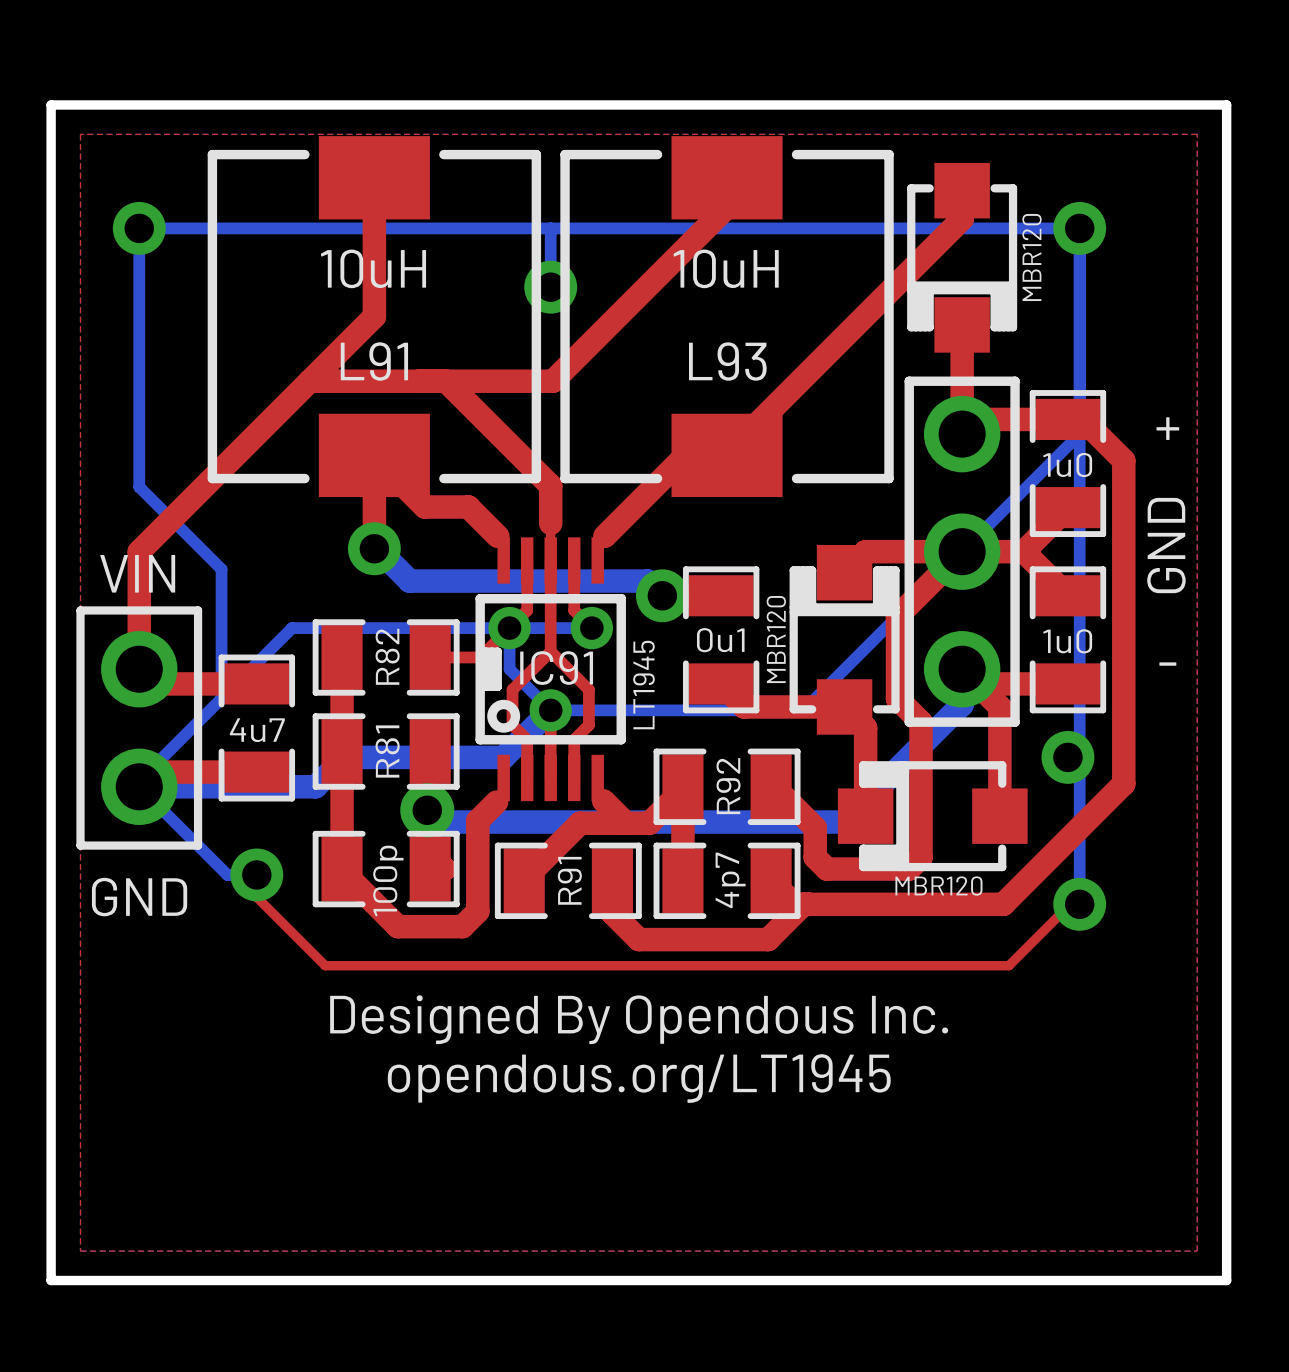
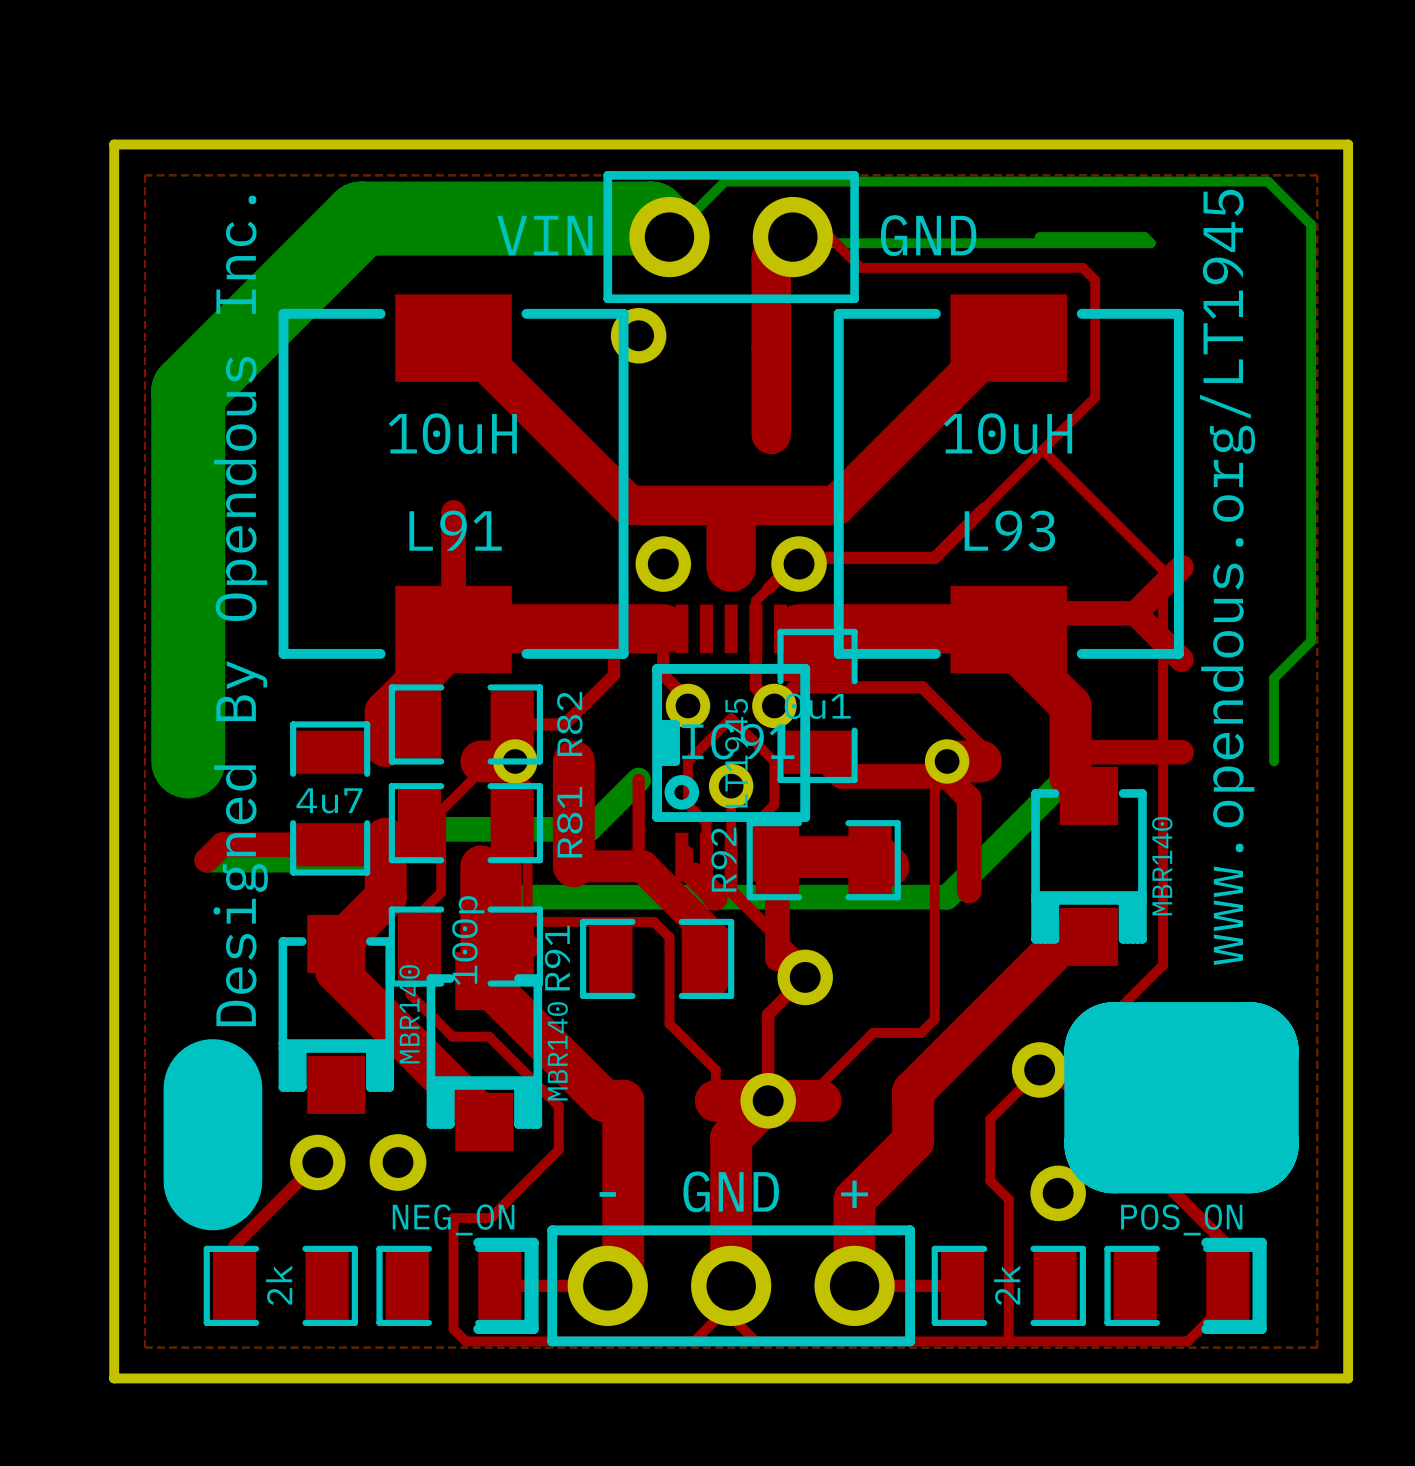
top track: (374, 177) (374, 316) (139, 551) (139, 669) (153, 683) (256, 683) -> none
top track: (727, 177) (727, 207) (552, 381) (309, 381) -> none
top track: (962, 190) (962, 219) (727, 455) (685, 455) (597, 543) (597, 560) -> none
text: none -> GND (928, 235)
bottom track: none -> (669, 237) (725, 181) (1267, 181) (1311, 224) (1311, 641) (1274, 678) (1274, 761)
bottom track: none -> (669, 237) (650, 218) (361, 218) (188, 391) (188, 761)
bottom track: none -> (792, 237) (799, 243) (1150, 243) (1144, 237) (1039, 237)
part: (139, 228) -> none
bottom track: (550, 228) (550, 287) -> none
part: (1079, 228) -> none
part: MBR120 (962, 257) -> none
top track: none -> (453, 338) (462, 338) (629, 505) (836, 505) (1003, 338) (1008, 338)
L91 position: (374, 316) -> (453, 483)
L93 position: (727, 316) -> (1008, 483)
top track: (962, 324) (962, 434) (976, 419) (1082, 419) (1123, 460) (1123, 783) (1003, 904) (794, 904) (771, 880) -> none
top track: (446, 381) (550, 485) (550, 651) -> none
top track: none -> (771, 434) (771, 258) (792, 237) (829, 237) (860, 267) (1082, 267) (1095, 280) (1095, 397) (934, 557) (799, 557) (755, 601) (755, 687) (774, 705) (792, 687) (922, 687) (981, 746) (981, 761) (947, 761) (947, 776) (934, 789) (934, 1019) (921, 1032) (873, 1032) (820, 1085) (820, 1100) (715, 1100) (715, 1069) (669, 1023) (669, 937) (654, 921) (536, 921) (527, 912) (527, 786) (515, 773) (515, 761) (481, 761) (481, 770) (441, 810) (441, 892) (410, 923) (410, 994) (452, 1036) (489, 1036) (558, 1106) (558, 1149) (490, 1218) (453, 1218) (453, 1329) (465, 1341) (694, 1341) (731, 1304)
top track: none -> (1042, 449) (1163, 570) (1163, 965) (1058, 1069) (1039, 1069)
text position: + (1167, 428) -> + (854, 1194)
bottom track: (1079, 434) (803, 710) (550, 710) (509, 669) (509, 628) -> none
top track: none -> (731, 511) (731, 567)
top track: (374, 456) (424, 507) (468, 507) (503, 542) (503, 560) -> none
part: 1u0 (1067, 463) -> none
part: none -> (663, 564)
part: none -> (799, 564)
text: none -> www.opendous.org/LT1945 (1227, 577)
text: GND (1166, 545) -> none
bottom track: (374, 548) (377, 548) (409, 581) (647, 581) (662, 595) -> none
part: (374, 548) -> none
top track: (962, 551) (897, 616) (897, 698) (921, 722) (921, 857) (909, 869) (826, 869) (815, 857) (815, 827) (774, 786) (771, 786) -> none
part rotation: 0° (962, 551) -> 90° clockwise (731, 1285)
part position: (962, 551) -> (731, 1285)
top track: none -> (681, 628) (454, 628) (453, 644) (385, 712) (385, 746)
top track: none -> (780, 628) (1008, 628) (1008, 644) (1070, 705) (1070, 777) (1089, 795)
text position: VIN (137, 573) -> VIN (544, 235)
part: (662, 595) -> none
part: (509, 628) -> none
bottom track: (591, 628) (292, 628) (139, 780) (139, 786) (227, 874) (256, 874) -> none
part position: (591, 628) -> (687, 705)
part: none -> (774, 705)
part: MBR120 (844, 639) -> none
part: 1u0 (1067, 639) -> none
top track: (550, 651) (512, 689) (512, 725) (527, 739) (527, 777) -> none
top track: (550, 651) (588, 689) (588, 725) (574, 739) (574, 777) -> none
R82 name position: R82 (387, 656) -> R82 (569, 723)
top track: (342, 657) (342, 870) (397, 926) (462, 926) (477, 911) (477, 820) (503, 795) (503, 777) -> none
text position: - (1167, 664) -> - (607, 1194)
IC91 position: (550, 669) -> (731, 742)
top track: (962, 669) (999, 706) (999, 816) -> none
part: none -> (515, 761)
top track: none -> (573, 761) (573, 866) (642, 866) (715, 939) (715, 977)
part: none -> (947, 761)
bottom track: (221, 698) (221, 569) (139, 487) (139, 228) (1079, 228) (1079, 745) (1067, 757) (1079, 769) (1079, 904) -> none
part: (550, 710) -> none
top track: none -> (731, 786) (731, 891) (805, 965) (805, 977) (768, 1014) (768, 1100) (731, 1137) (731, 1316) (755, 1341) (1187, 1341) (1227, 1301) (1227, 1245) (1051, 1069) (1039, 1069)
part: none -> (731, 786)
part rotation: 0° (139, 728) -> 90° clockwise (731, 237)
part position: (139, 728) -> (731, 237)
R81 name position: R81 (387, 751) -> R81 (569, 822)
part: (1067, 757) -> none
top track: none -> (385, 838) (385, 897) (338, 943) (336, 943) (336, 971) (484, 1119) (484, 1121)
top track: none -> (706, 857) (706, 823) (687, 804) (687, 761) (731, 718) (774, 761) (774, 804) (755, 823) (755, 857)
top track: none -> (780, 857) (879, 857) (888, 866)
R92 name position: R92 (728, 786) -> R92 (723, 859)
top track: (682, 789) (649, 823) (580, 823) (524, 880) -> none
top track: none -> (481, 866) (481, 977) (604, 1100) (623, 1100) (623, 1270) (607, 1285) (499, 1285)
part: none -> MBR140 (1089, 866)
part position: (427, 810) -> (398, 1162)
part: MBR120 (932, 816) -> none
part footprint: [653, 842, 801, 920] -> [777, 949, 833, 1006]
top track: none -> (1089, 936) (1067, 936) (913, 1091) (913, 1140) (854, 1199) (854, 1285) (962, 1285)
top track: (256, 874) (256, 897) (325, 965) (1008, 965) (1070, 904) (1079, 904) -> none
part position: (256, 874) -> (317, 1162)
part value position: 100p (388, 880) -> 100p (468, 940)
R91 name position: R91 (569, 880) -> R91 (557, 958)
top track: (612, 880) (612, 913) (638, 939) (768, 939) (803, 904) -> none
part value: 4p7 (730, 880) -> none
text: GND (139, 897) -> none
part: (1079, 904) -> none
part: none -> MBR140 (336, 1014)
part: none -> MBR140 (484, 1051)
line: none -> (1113, 1051) (1249, 1051) (1249, 1143) (1113, 1143) (1113, 1051)
top track: none -> (1039, 1069) (990, 1119) (990, 1181) (1008, 1199) (1008, 1341)
part: none -> (1039, 1069)
line: none -> (212, 1088) (212, 1181)
part: none -> (768, 1100)
text rotation: 0° (639, 1019) -> 90° counterclockwise (240, 610)
top track: none -> (317, 1162) (234, 1245) (234, 1285)
text: opendous.org/LT1945 (639, 1078) -> GND (731, 1191)
part: none -> (1058, 1193)
part: none -> 2k (280, 1285)
part: none -> NEG_ON (457, 1285)
part: none -> 2k (1008, 1285)
part: none -> POS_ON (1185, 1285)

